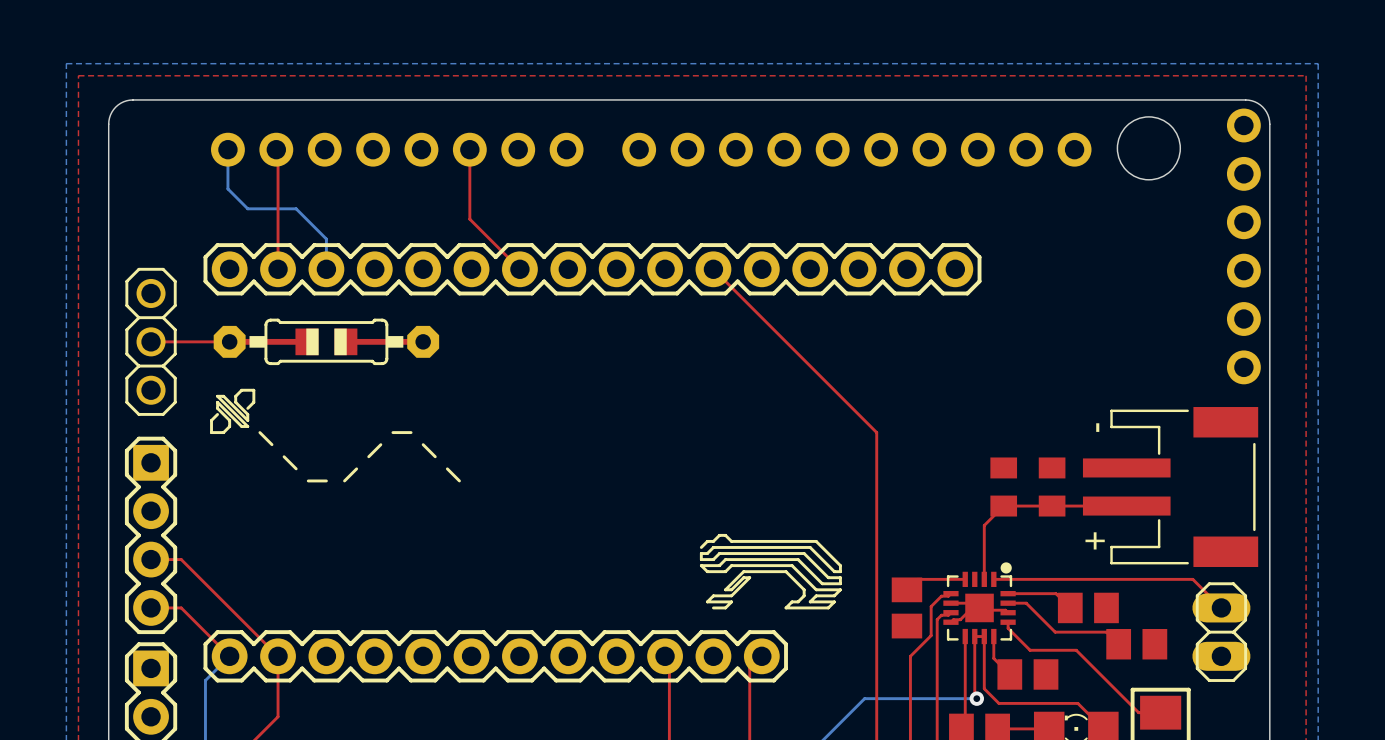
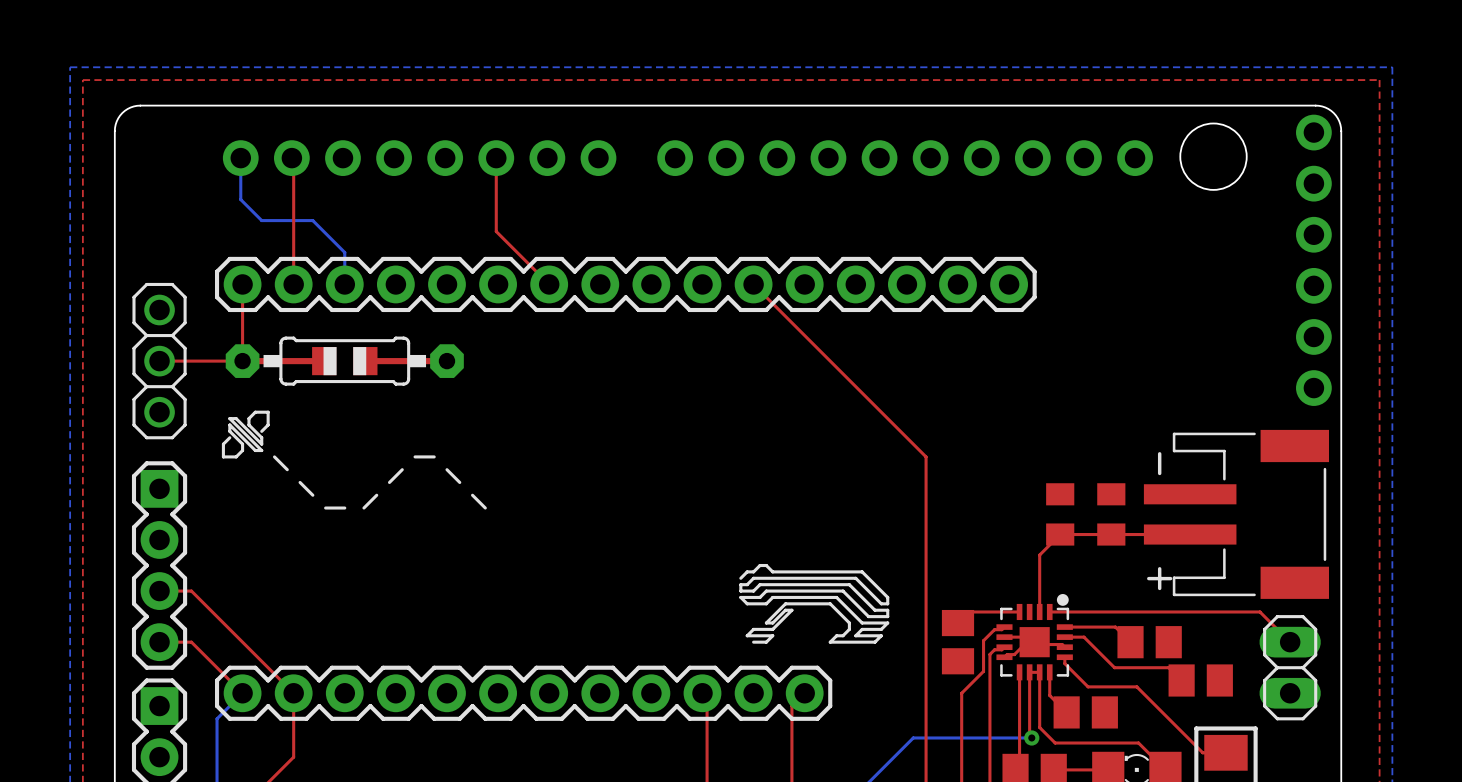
top track: none -> (242, 284) (242, 353)

